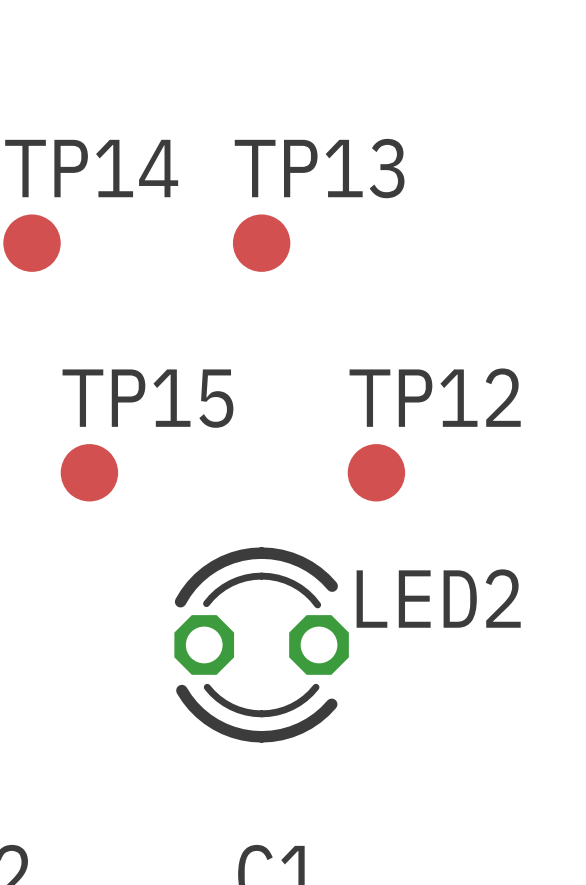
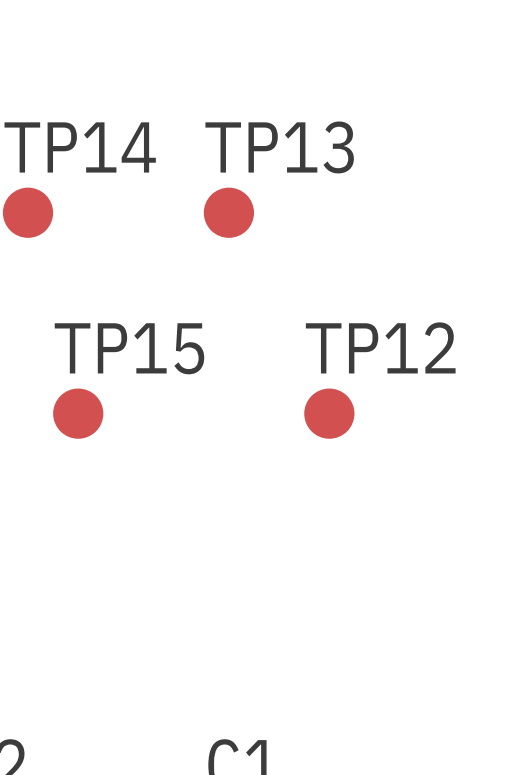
LED2: (261, 644) -> none

